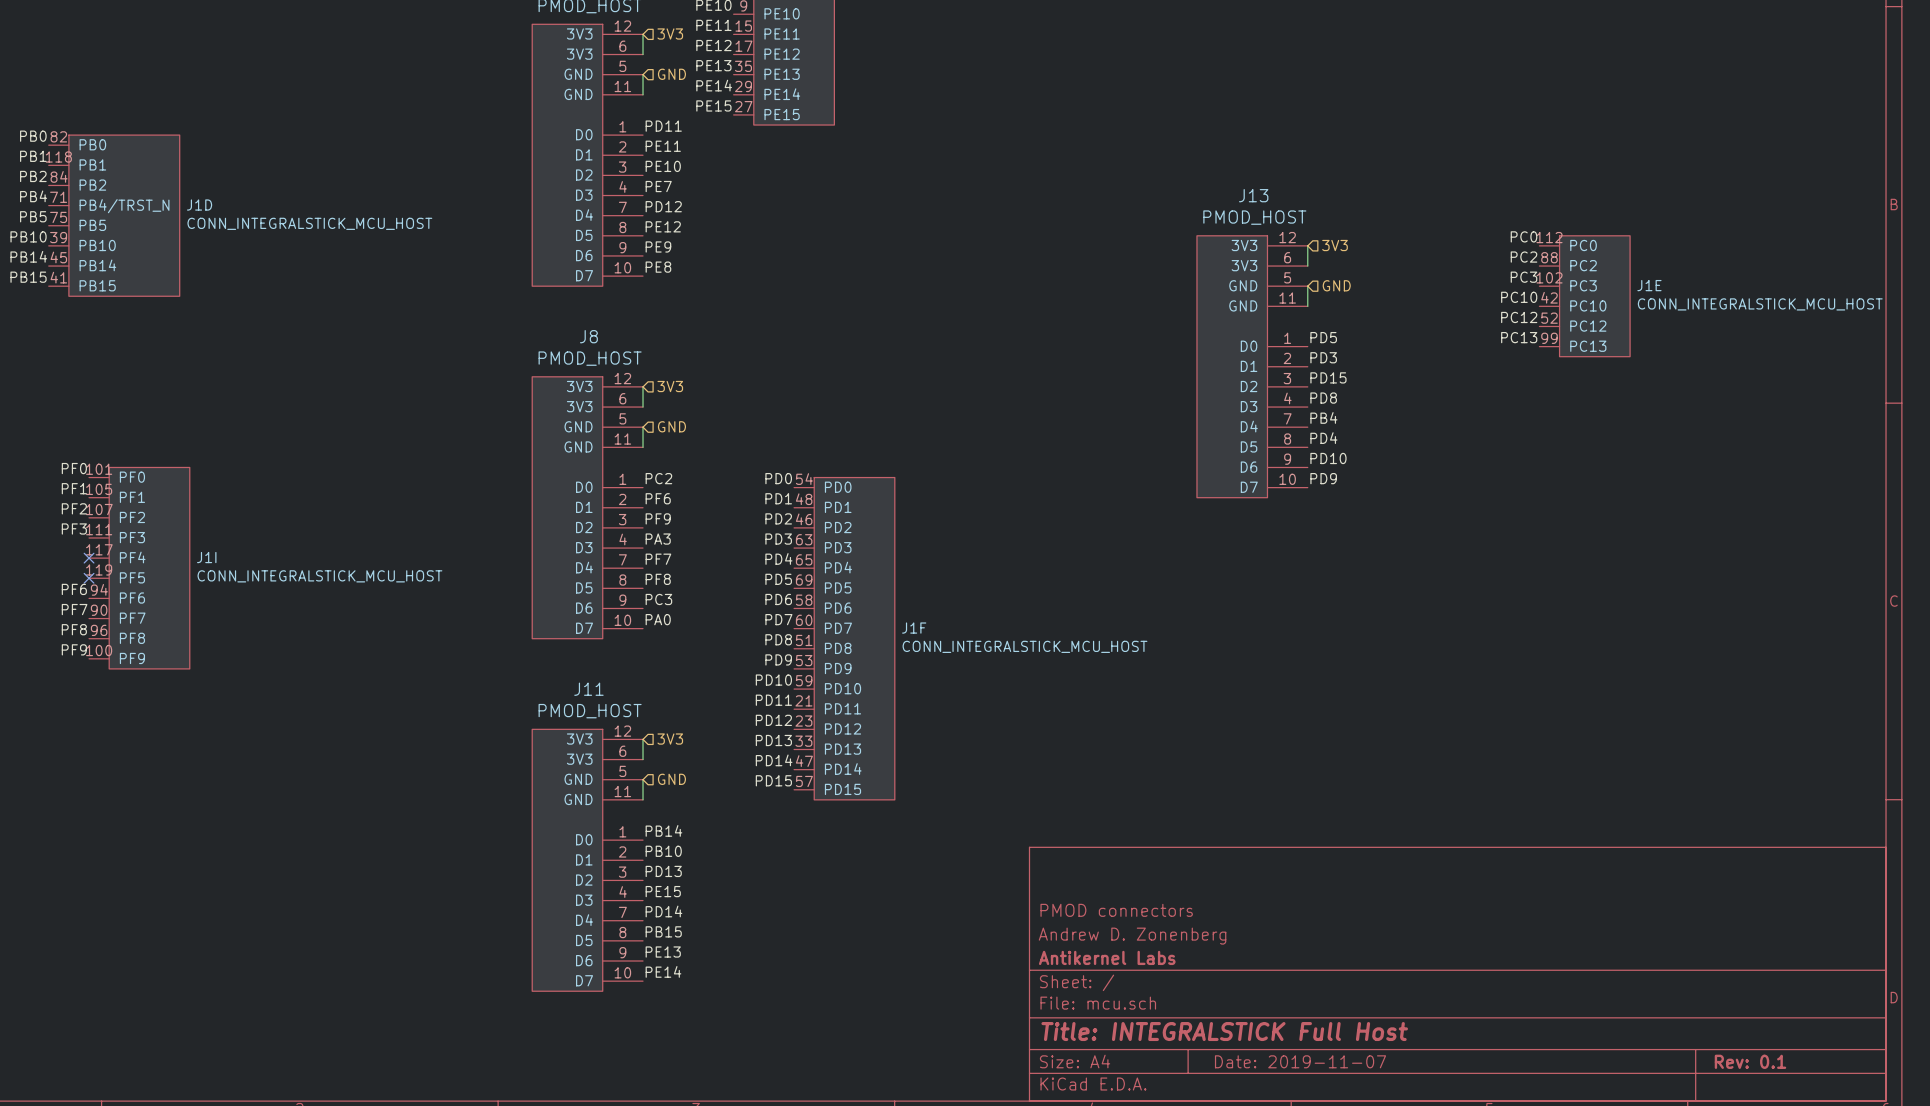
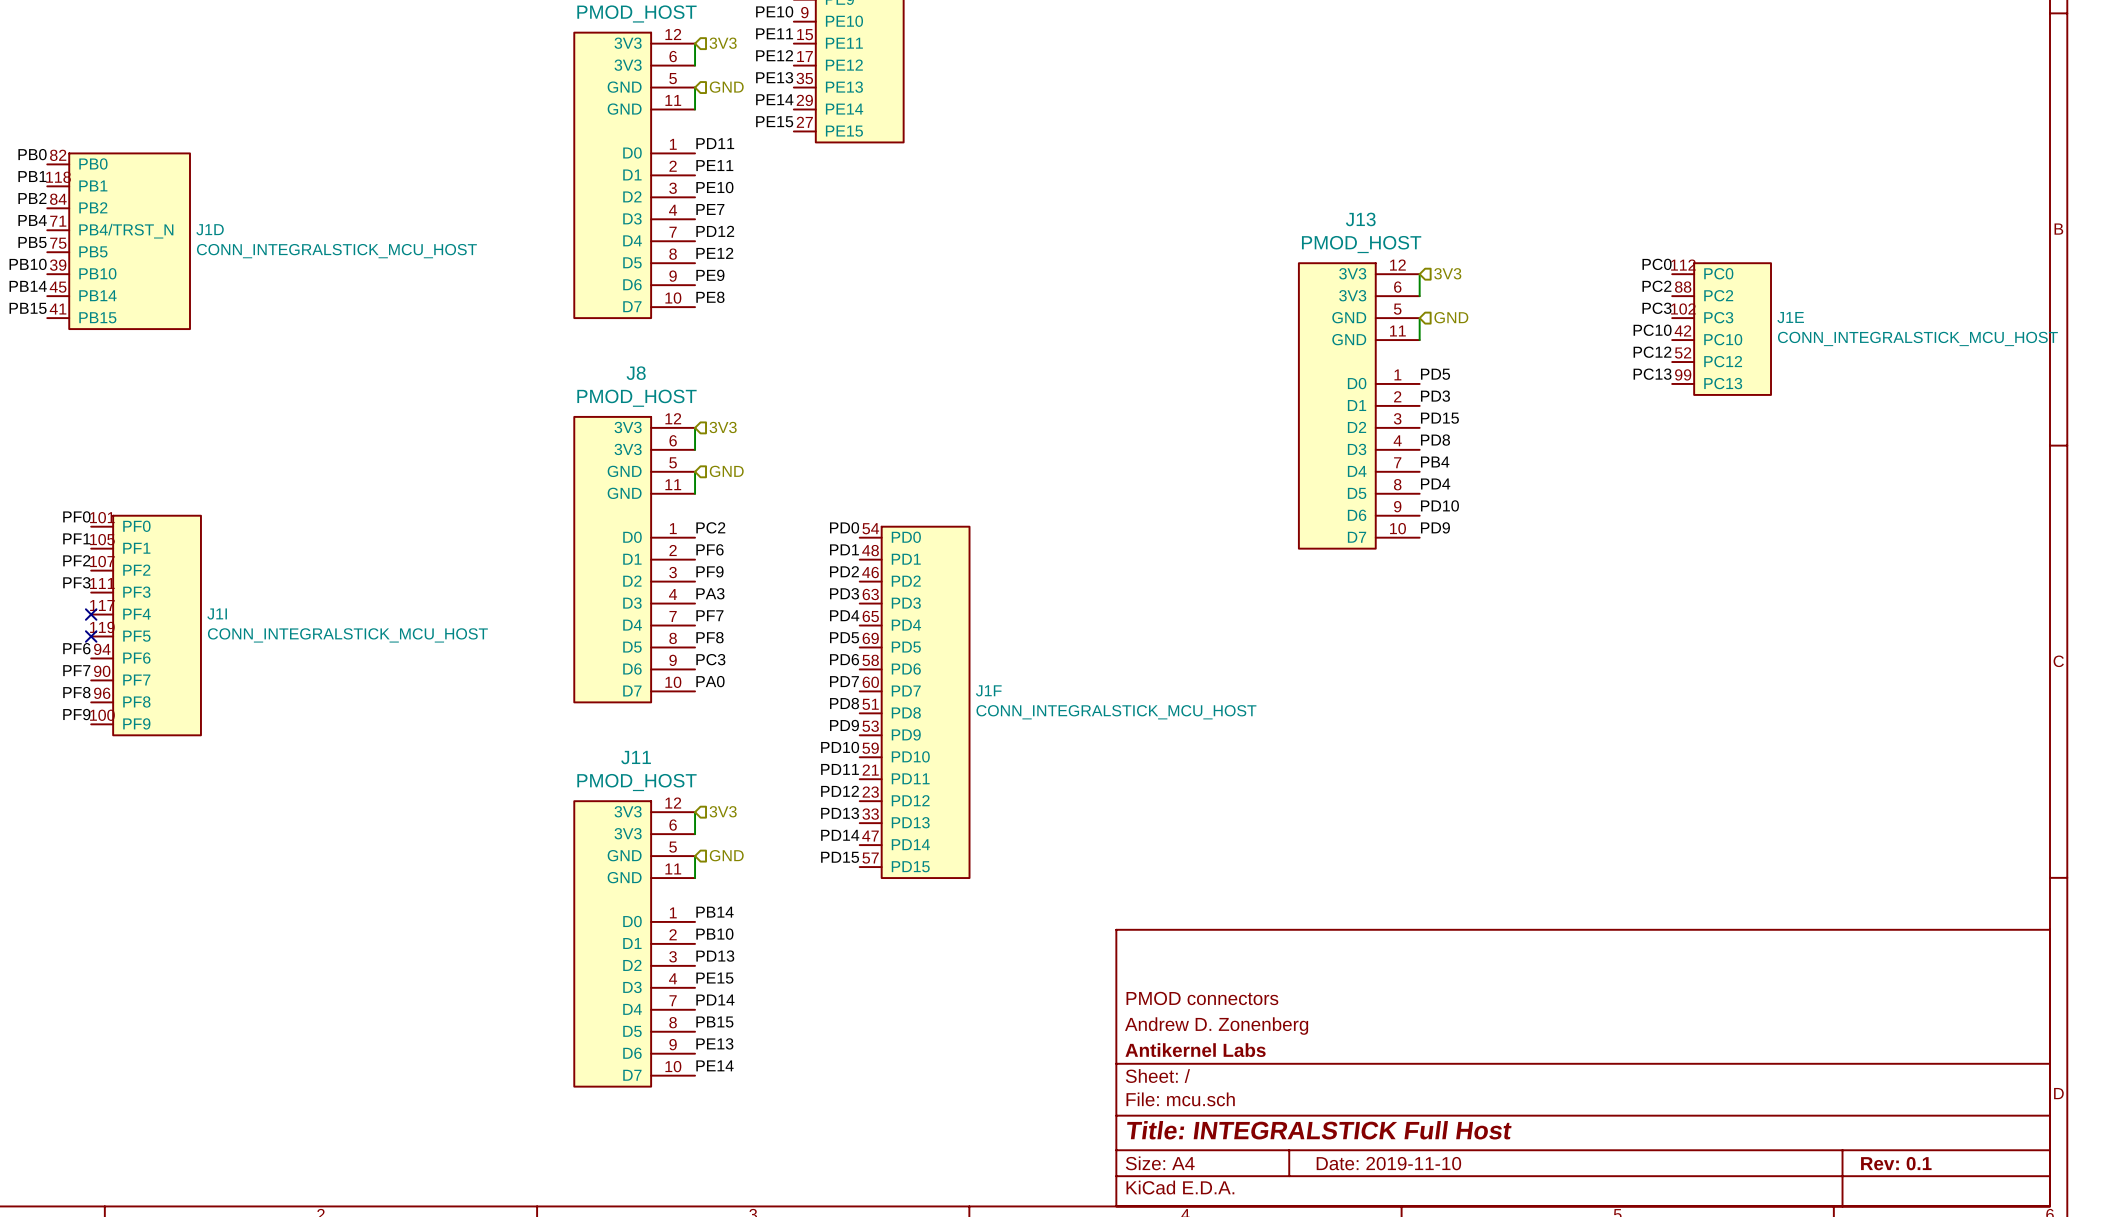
title block: Date: 2019-11-07 (1300, 1061) -> Date: 2019-11-10 (1388, 1163)

